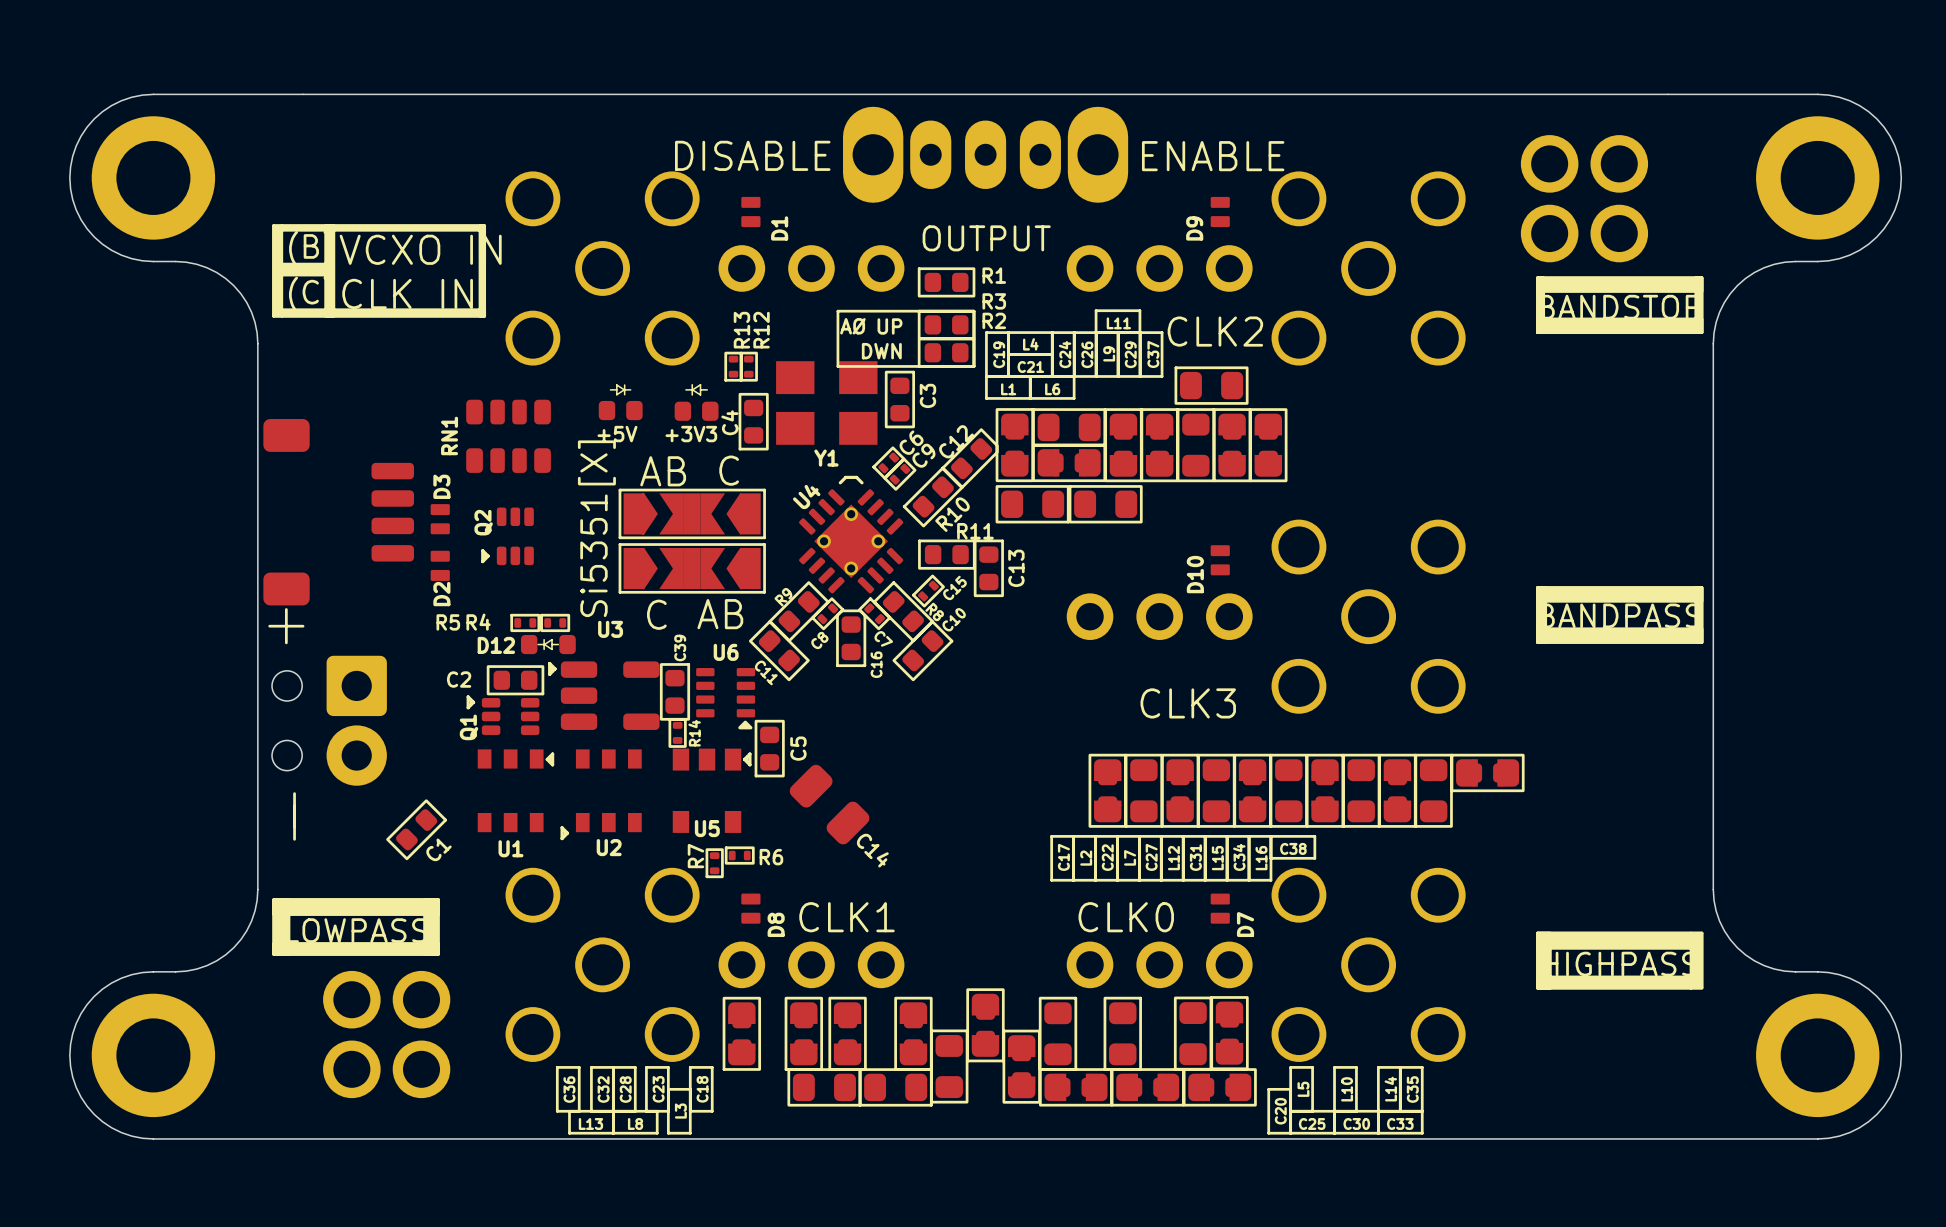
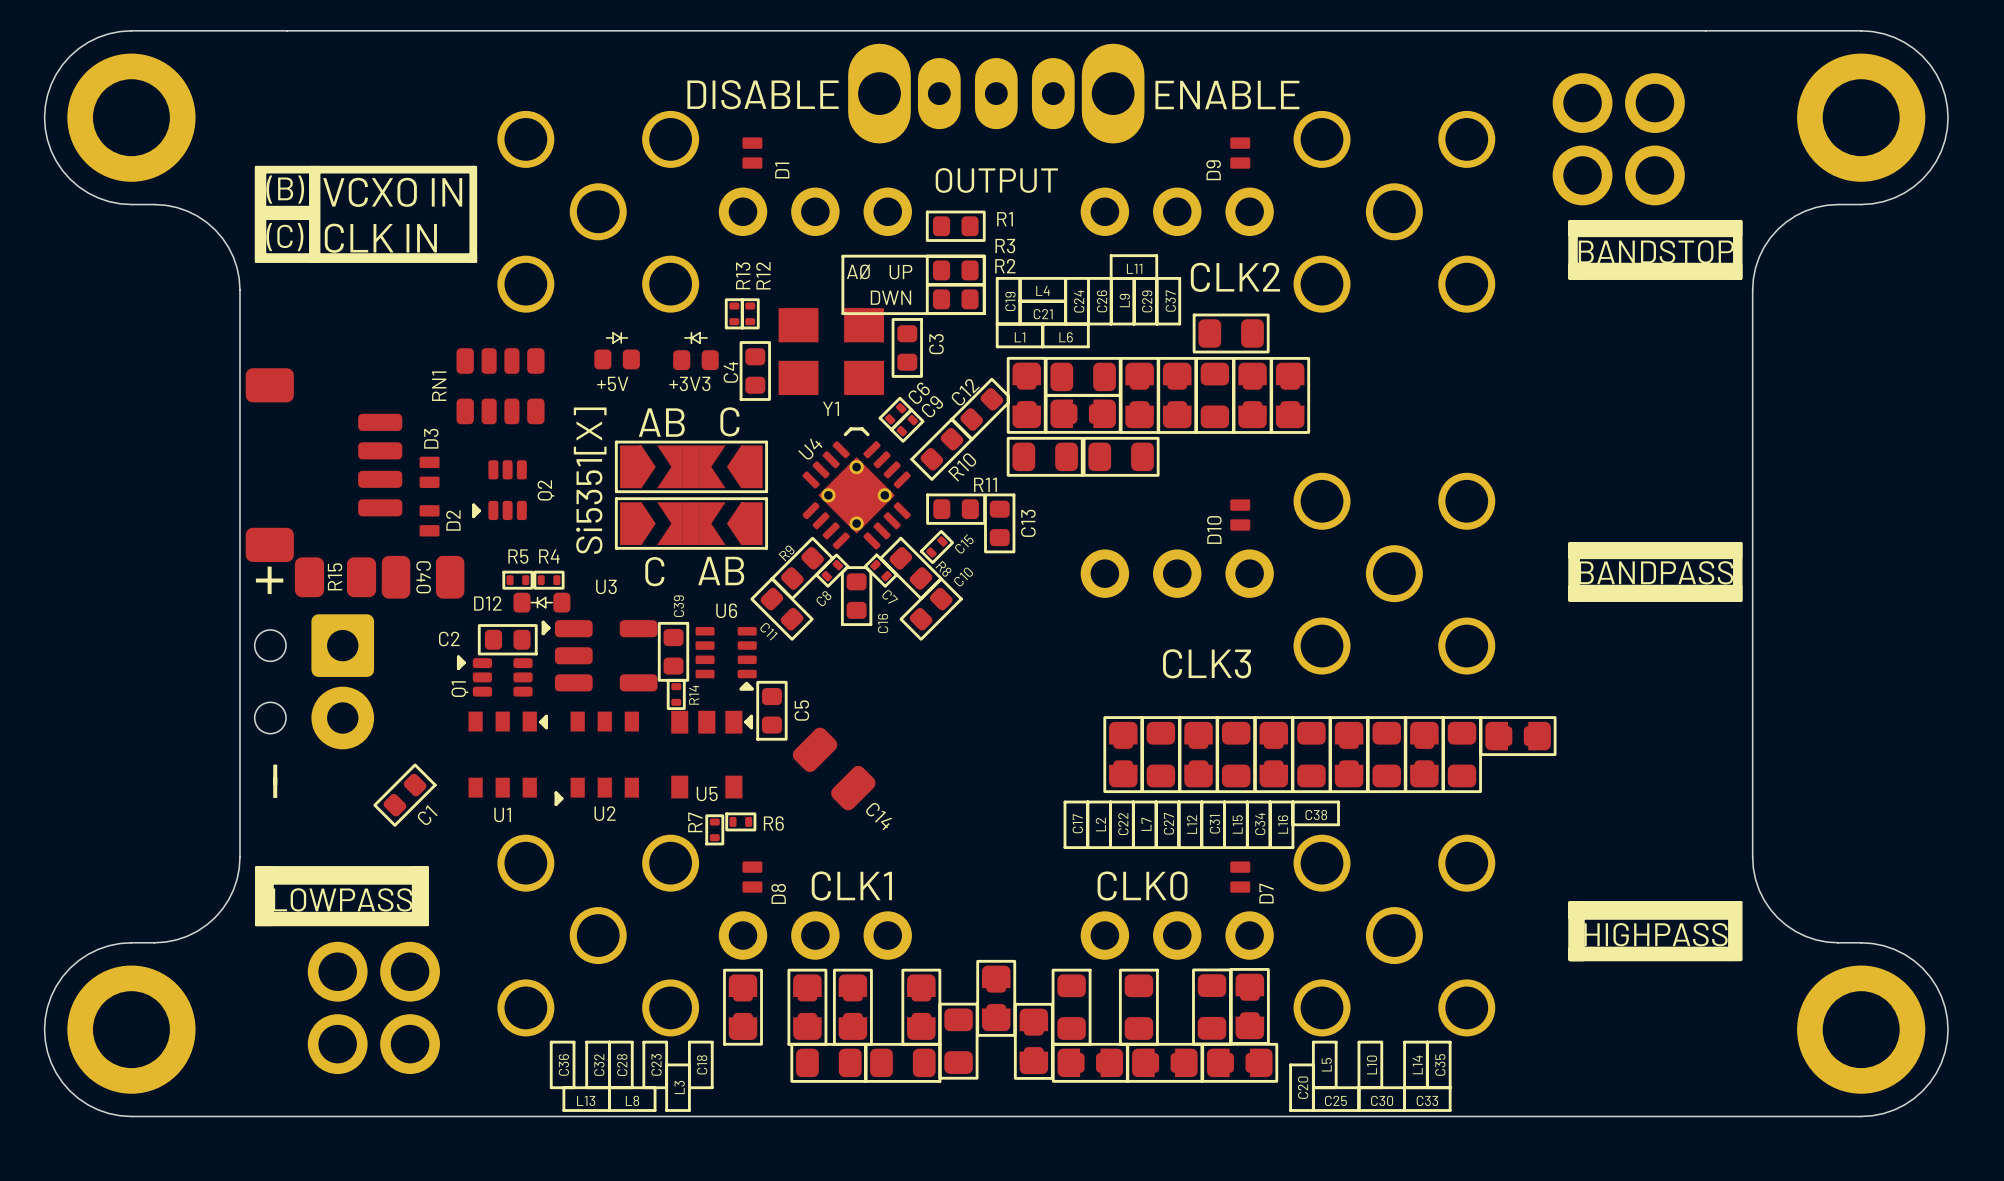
Q2 name position: Q2 (483, 522) -> Q2 (545, 490)
D2 name position: D2 (441, 594) -> D2 (453, 520)
R15: none -> (335, 577)
C40: none -> (423, 577)
R5 name position: R5 (448, 622) -> R5 (518, 556)
R4 name position: R4 (478, 622) -> R4 (549, 556)

